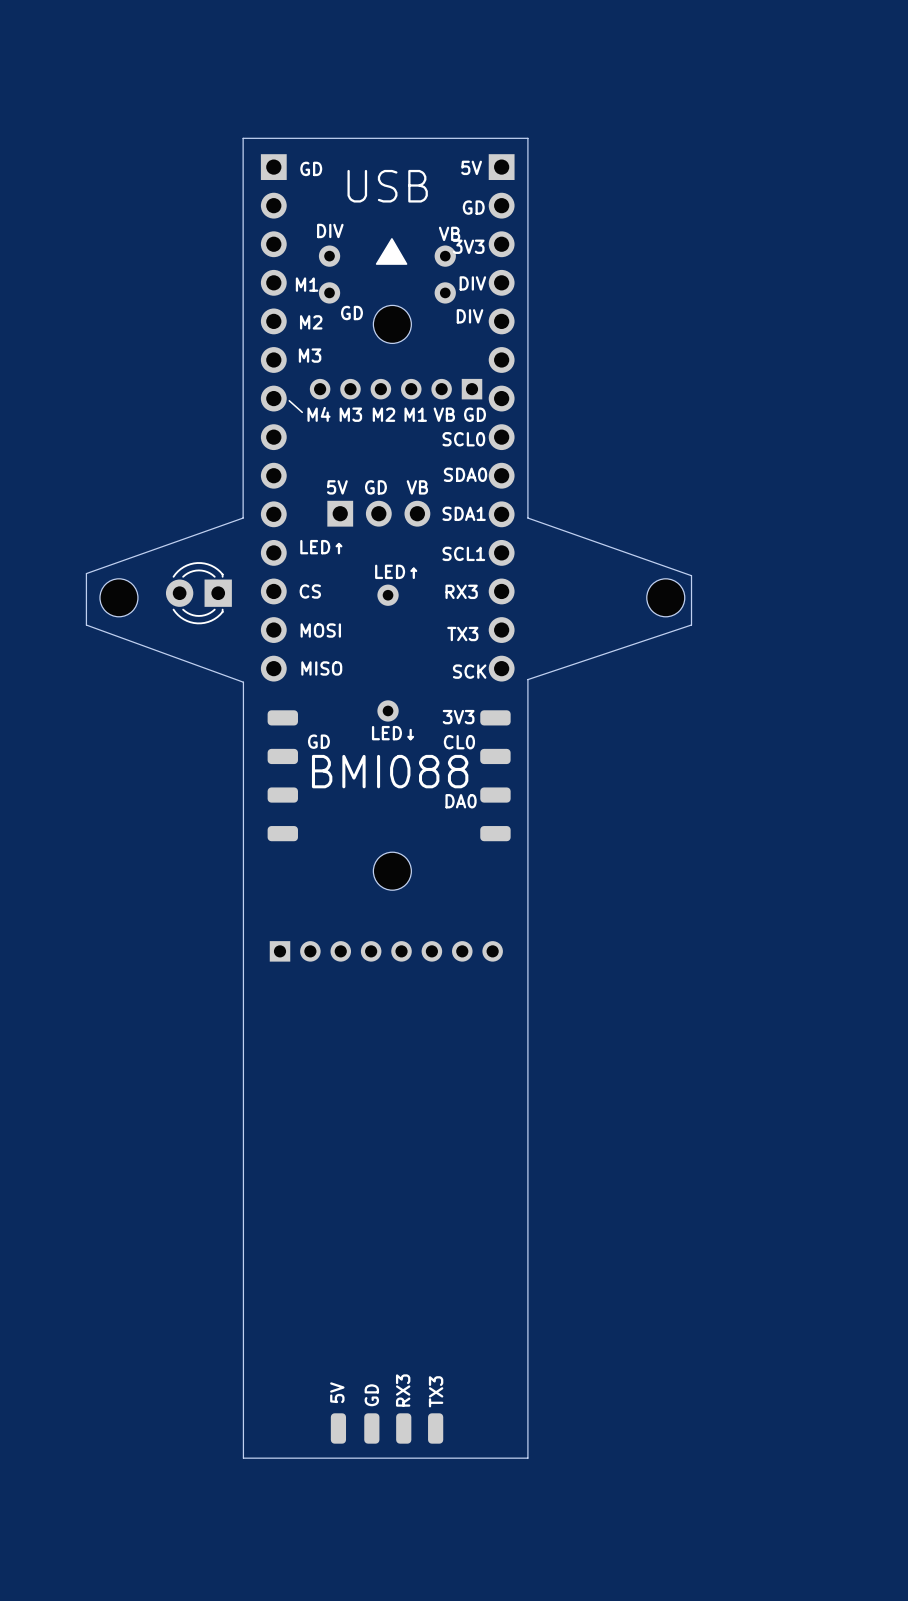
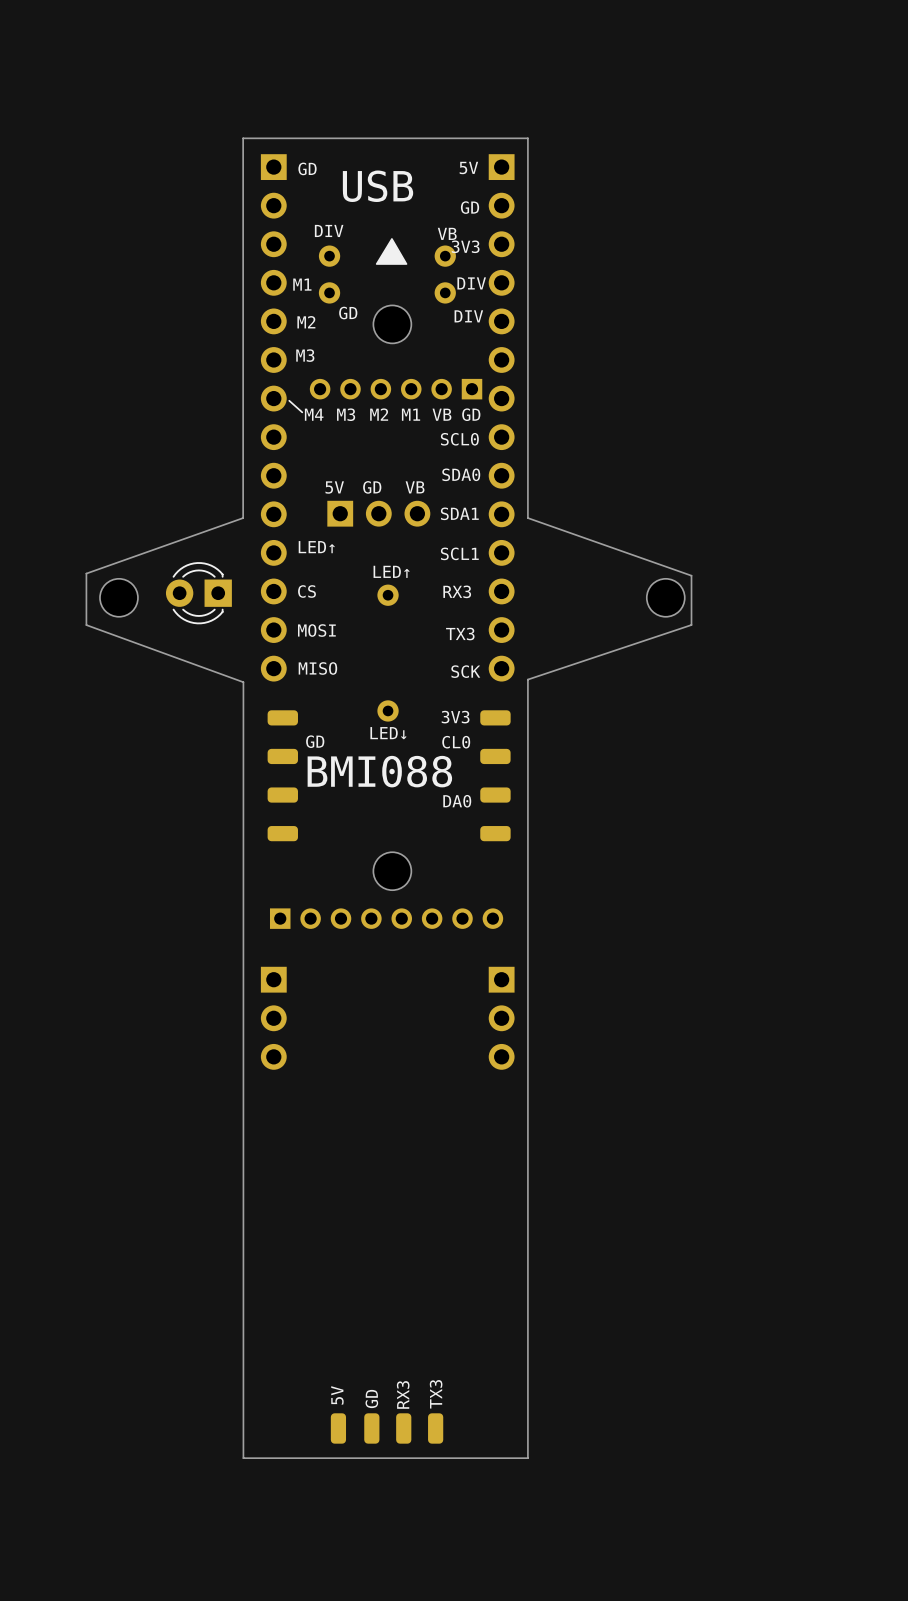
part position: (386, 951) -> (386, 918)
part: none -> (273, 1018)
part: none -> (501, 1018)

